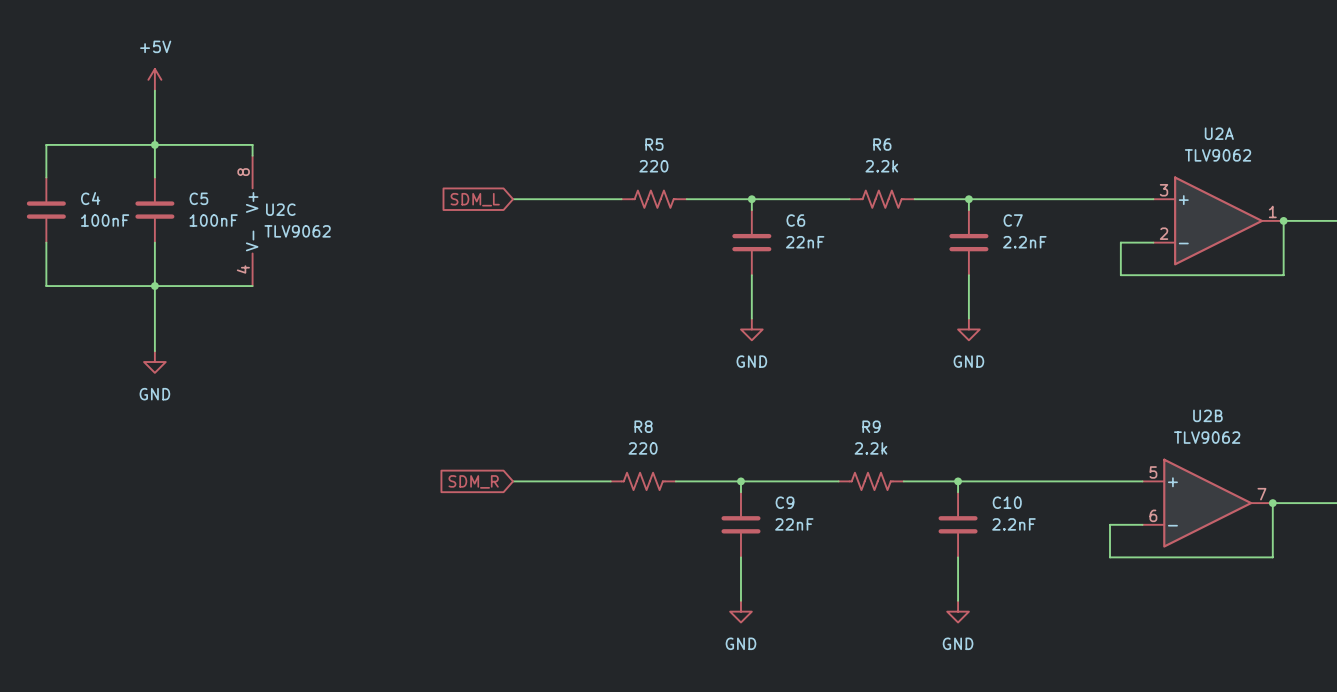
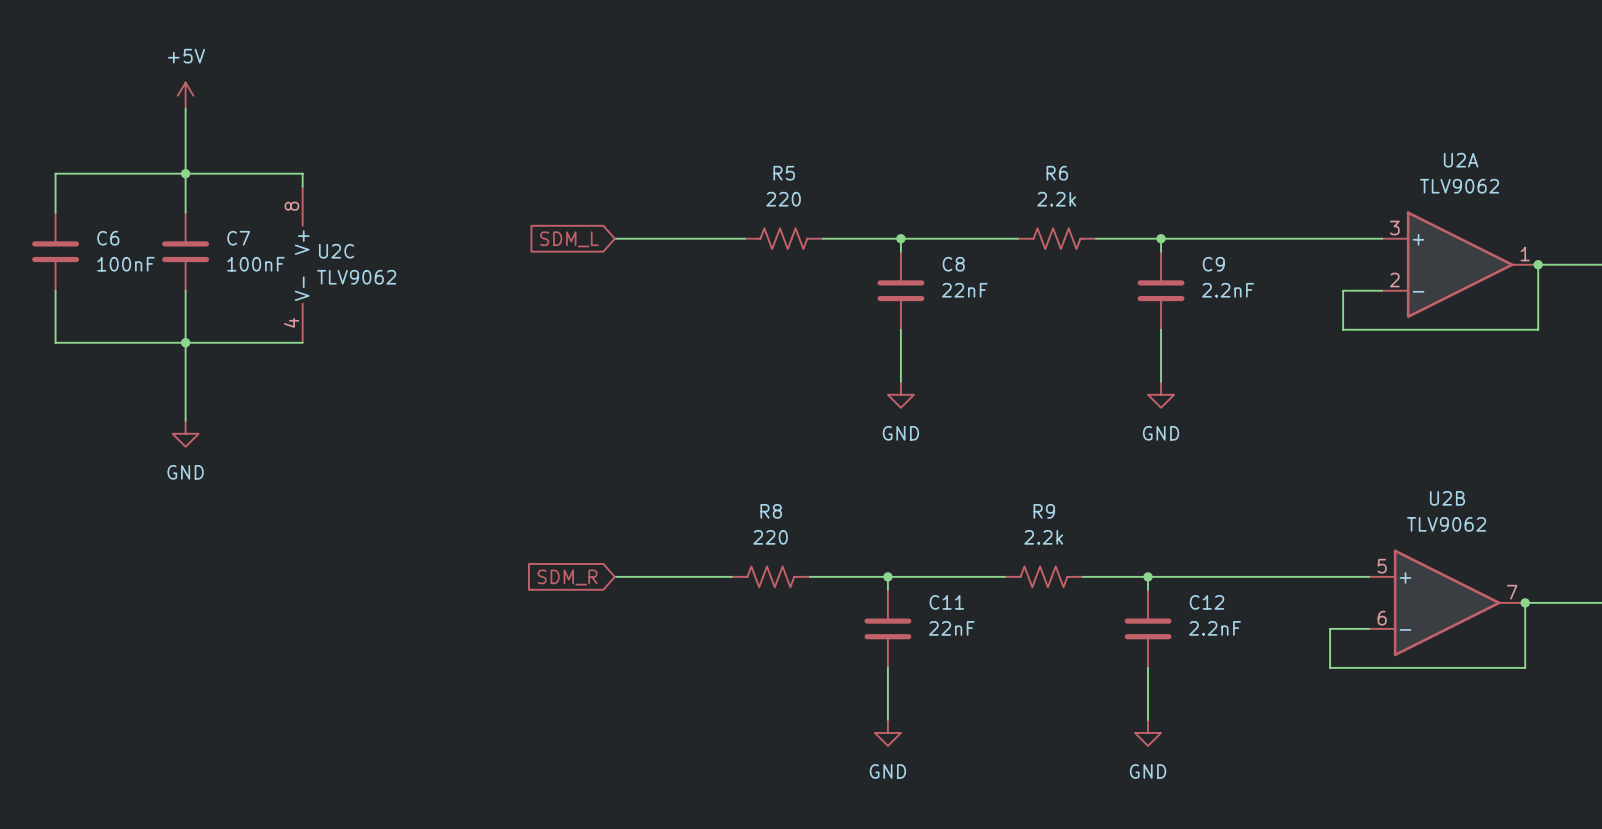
C4 name: C4 (90, 198) -> C6 (108, 238)
C5 name: C5 (198, 198) -> C7 (238, 238)
C6 name: C6 (795, 220) -> C8 (953, 264)
C7 name: C7 (1013, 220) -> C9 (1213, 264)
C9 name: C9 (784, 502) -> C11 (946, 602)
C10 name: C10 (1007, 502) -> C12 (1206, 602)

